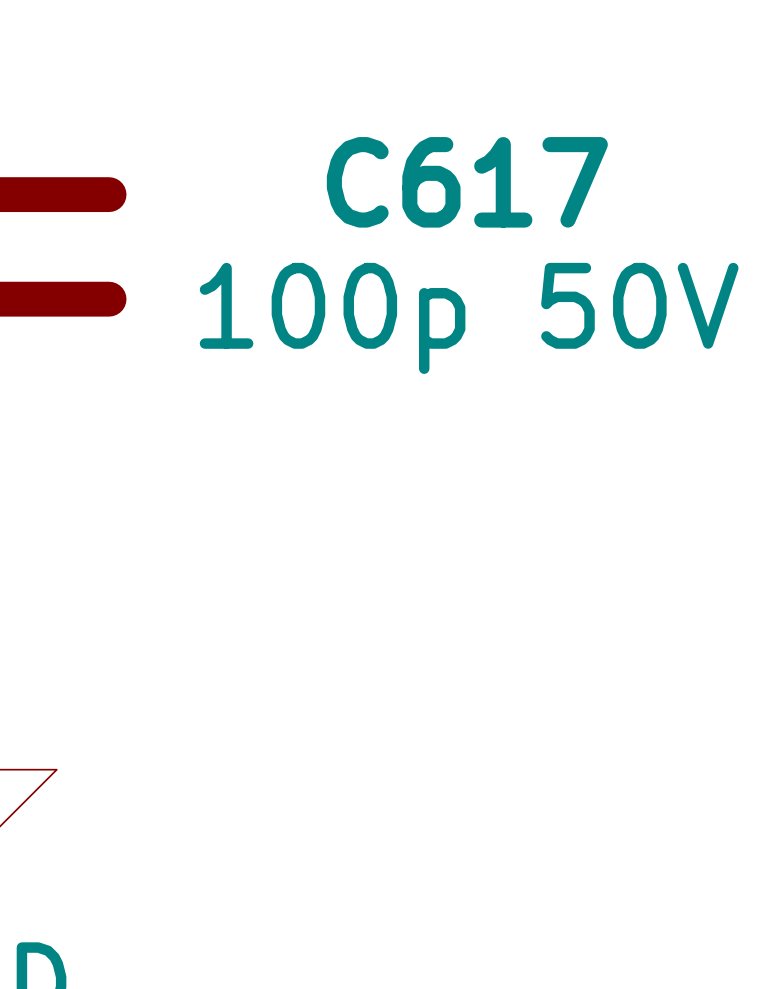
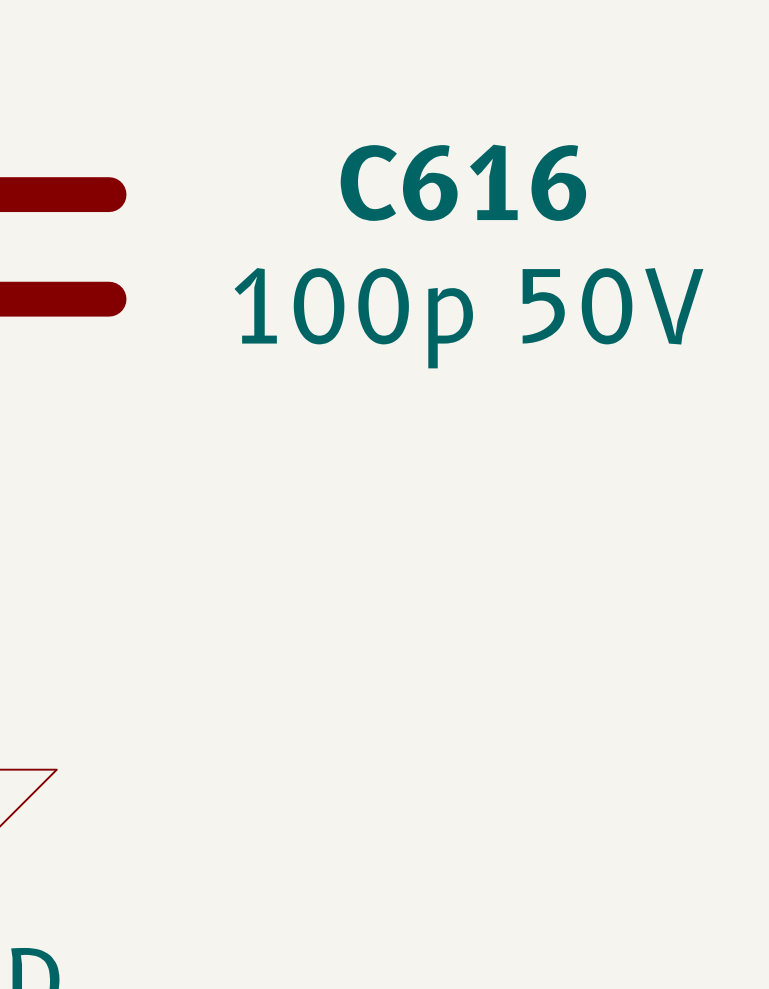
C617 name: C617 (467, 182) -> C616 (463, 182)

